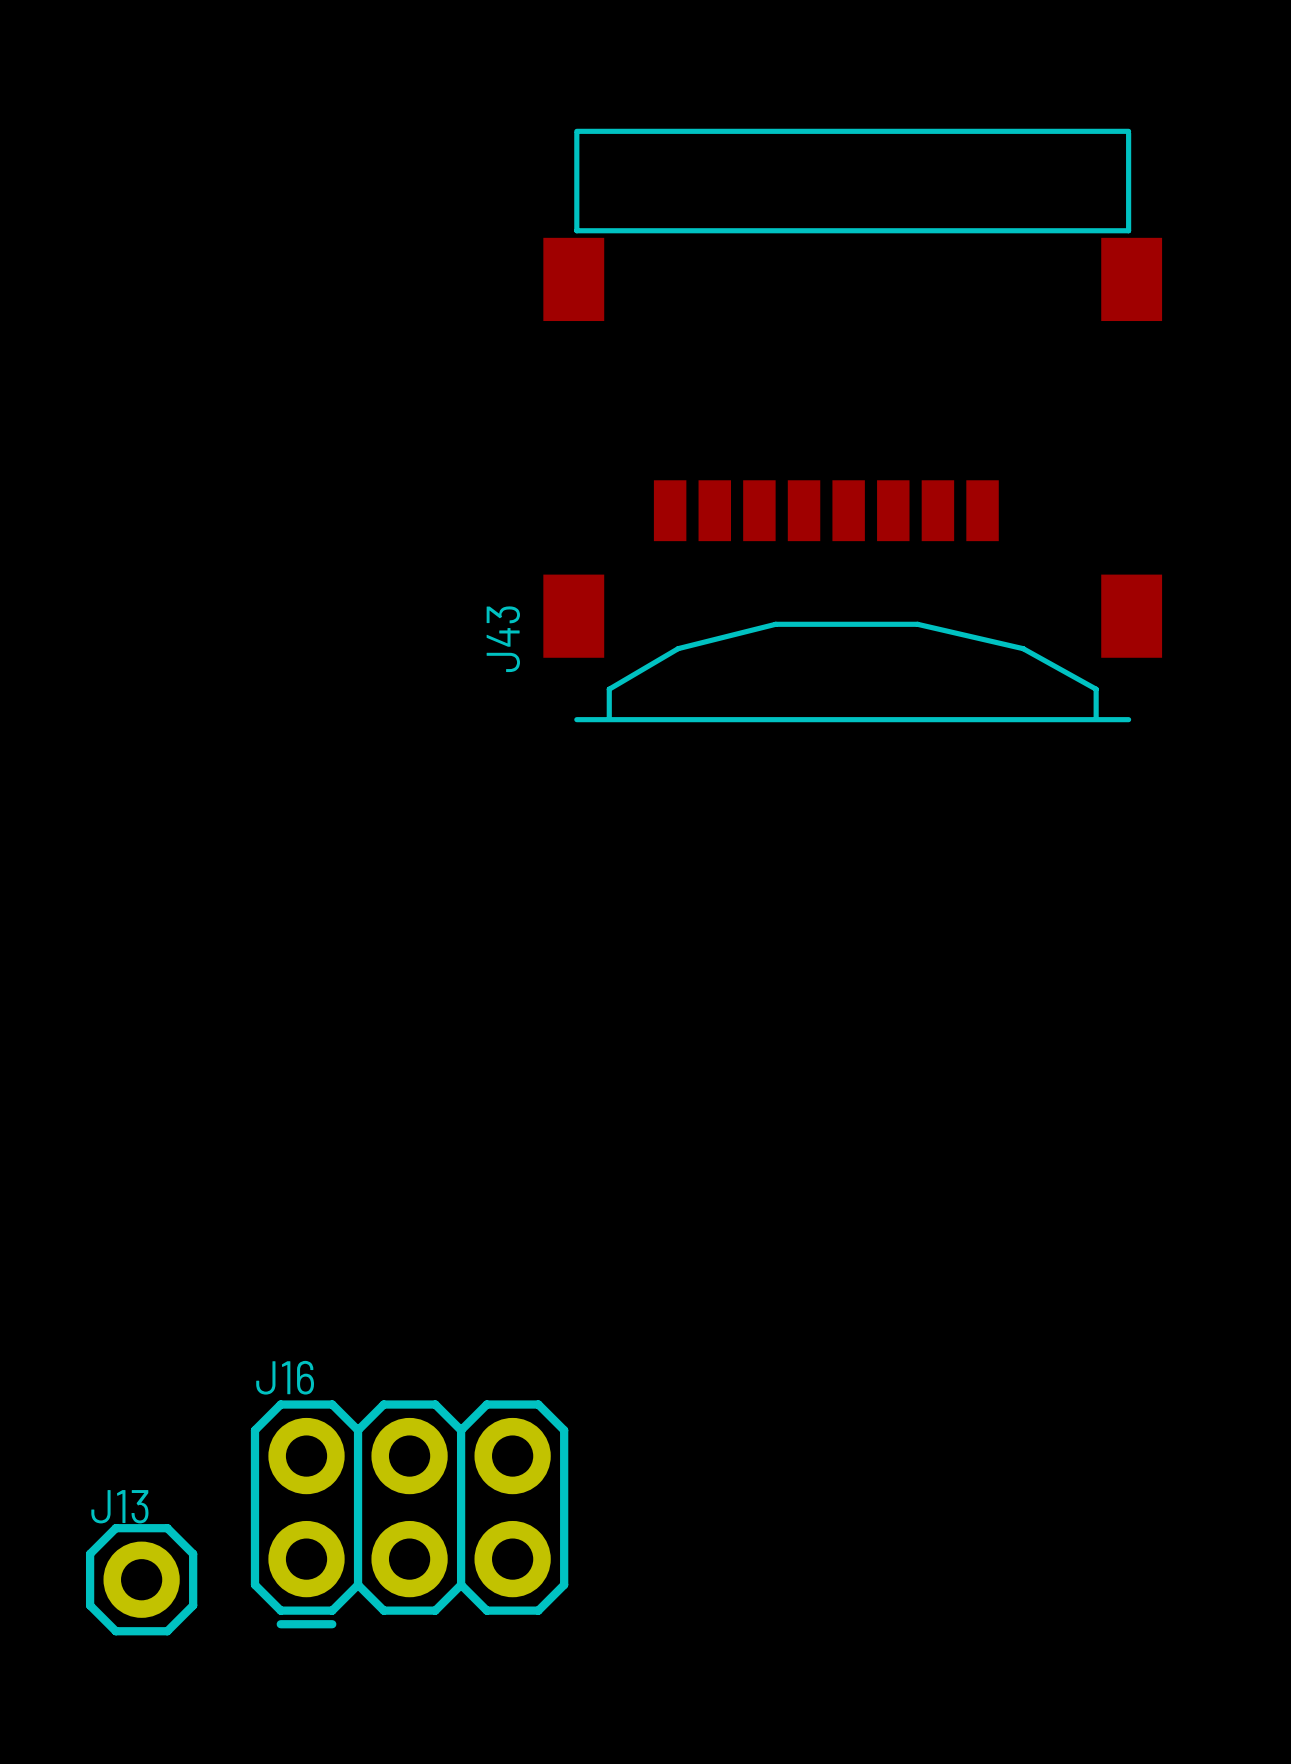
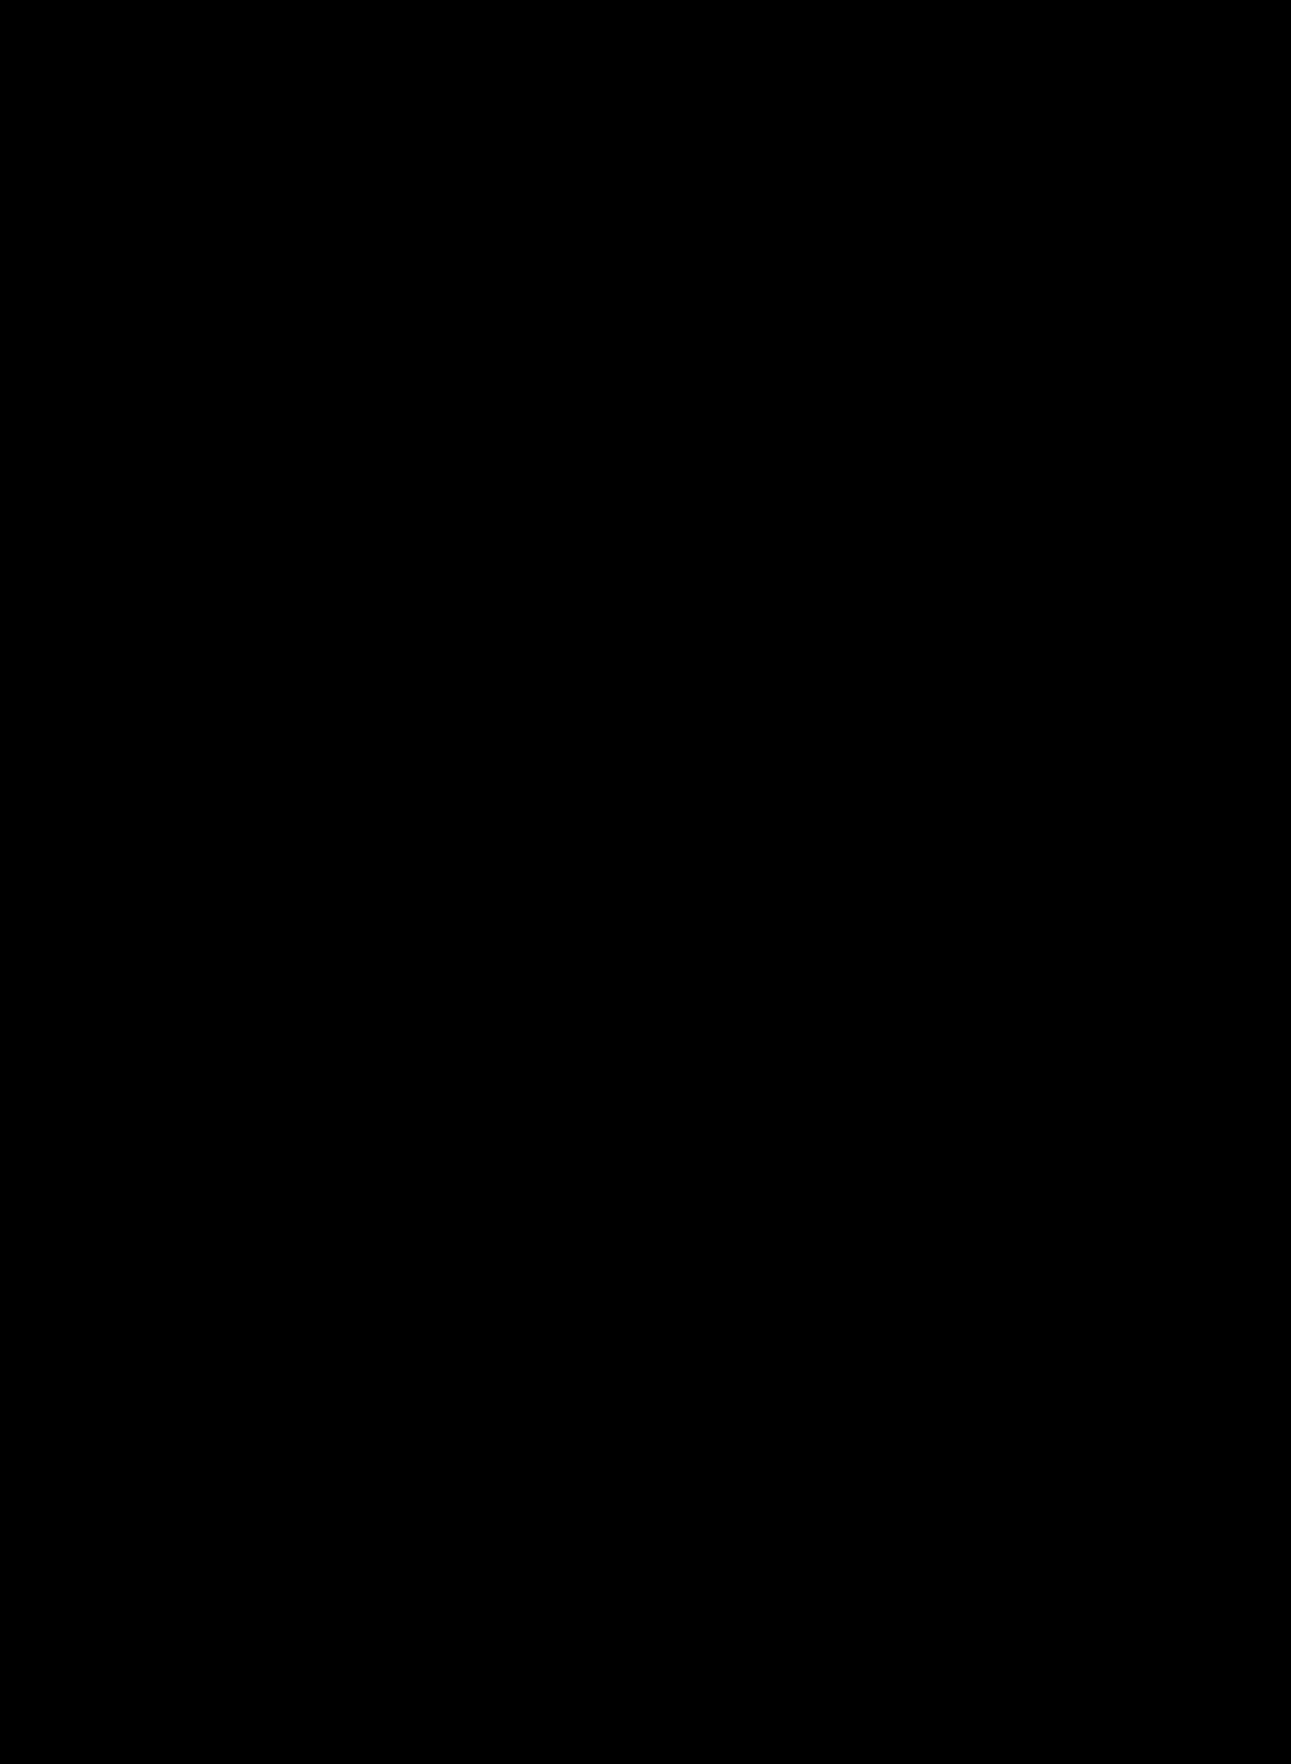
J43: (852, 425) -> none
J16: (409, 1514) -> none
J13: (141, 1579) -> none

